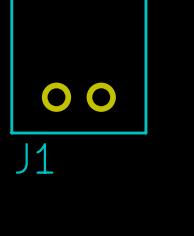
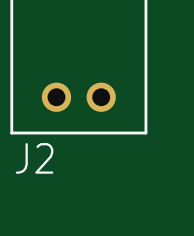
J1 name: J1 (34, 158) -> J2 (34, 158)

